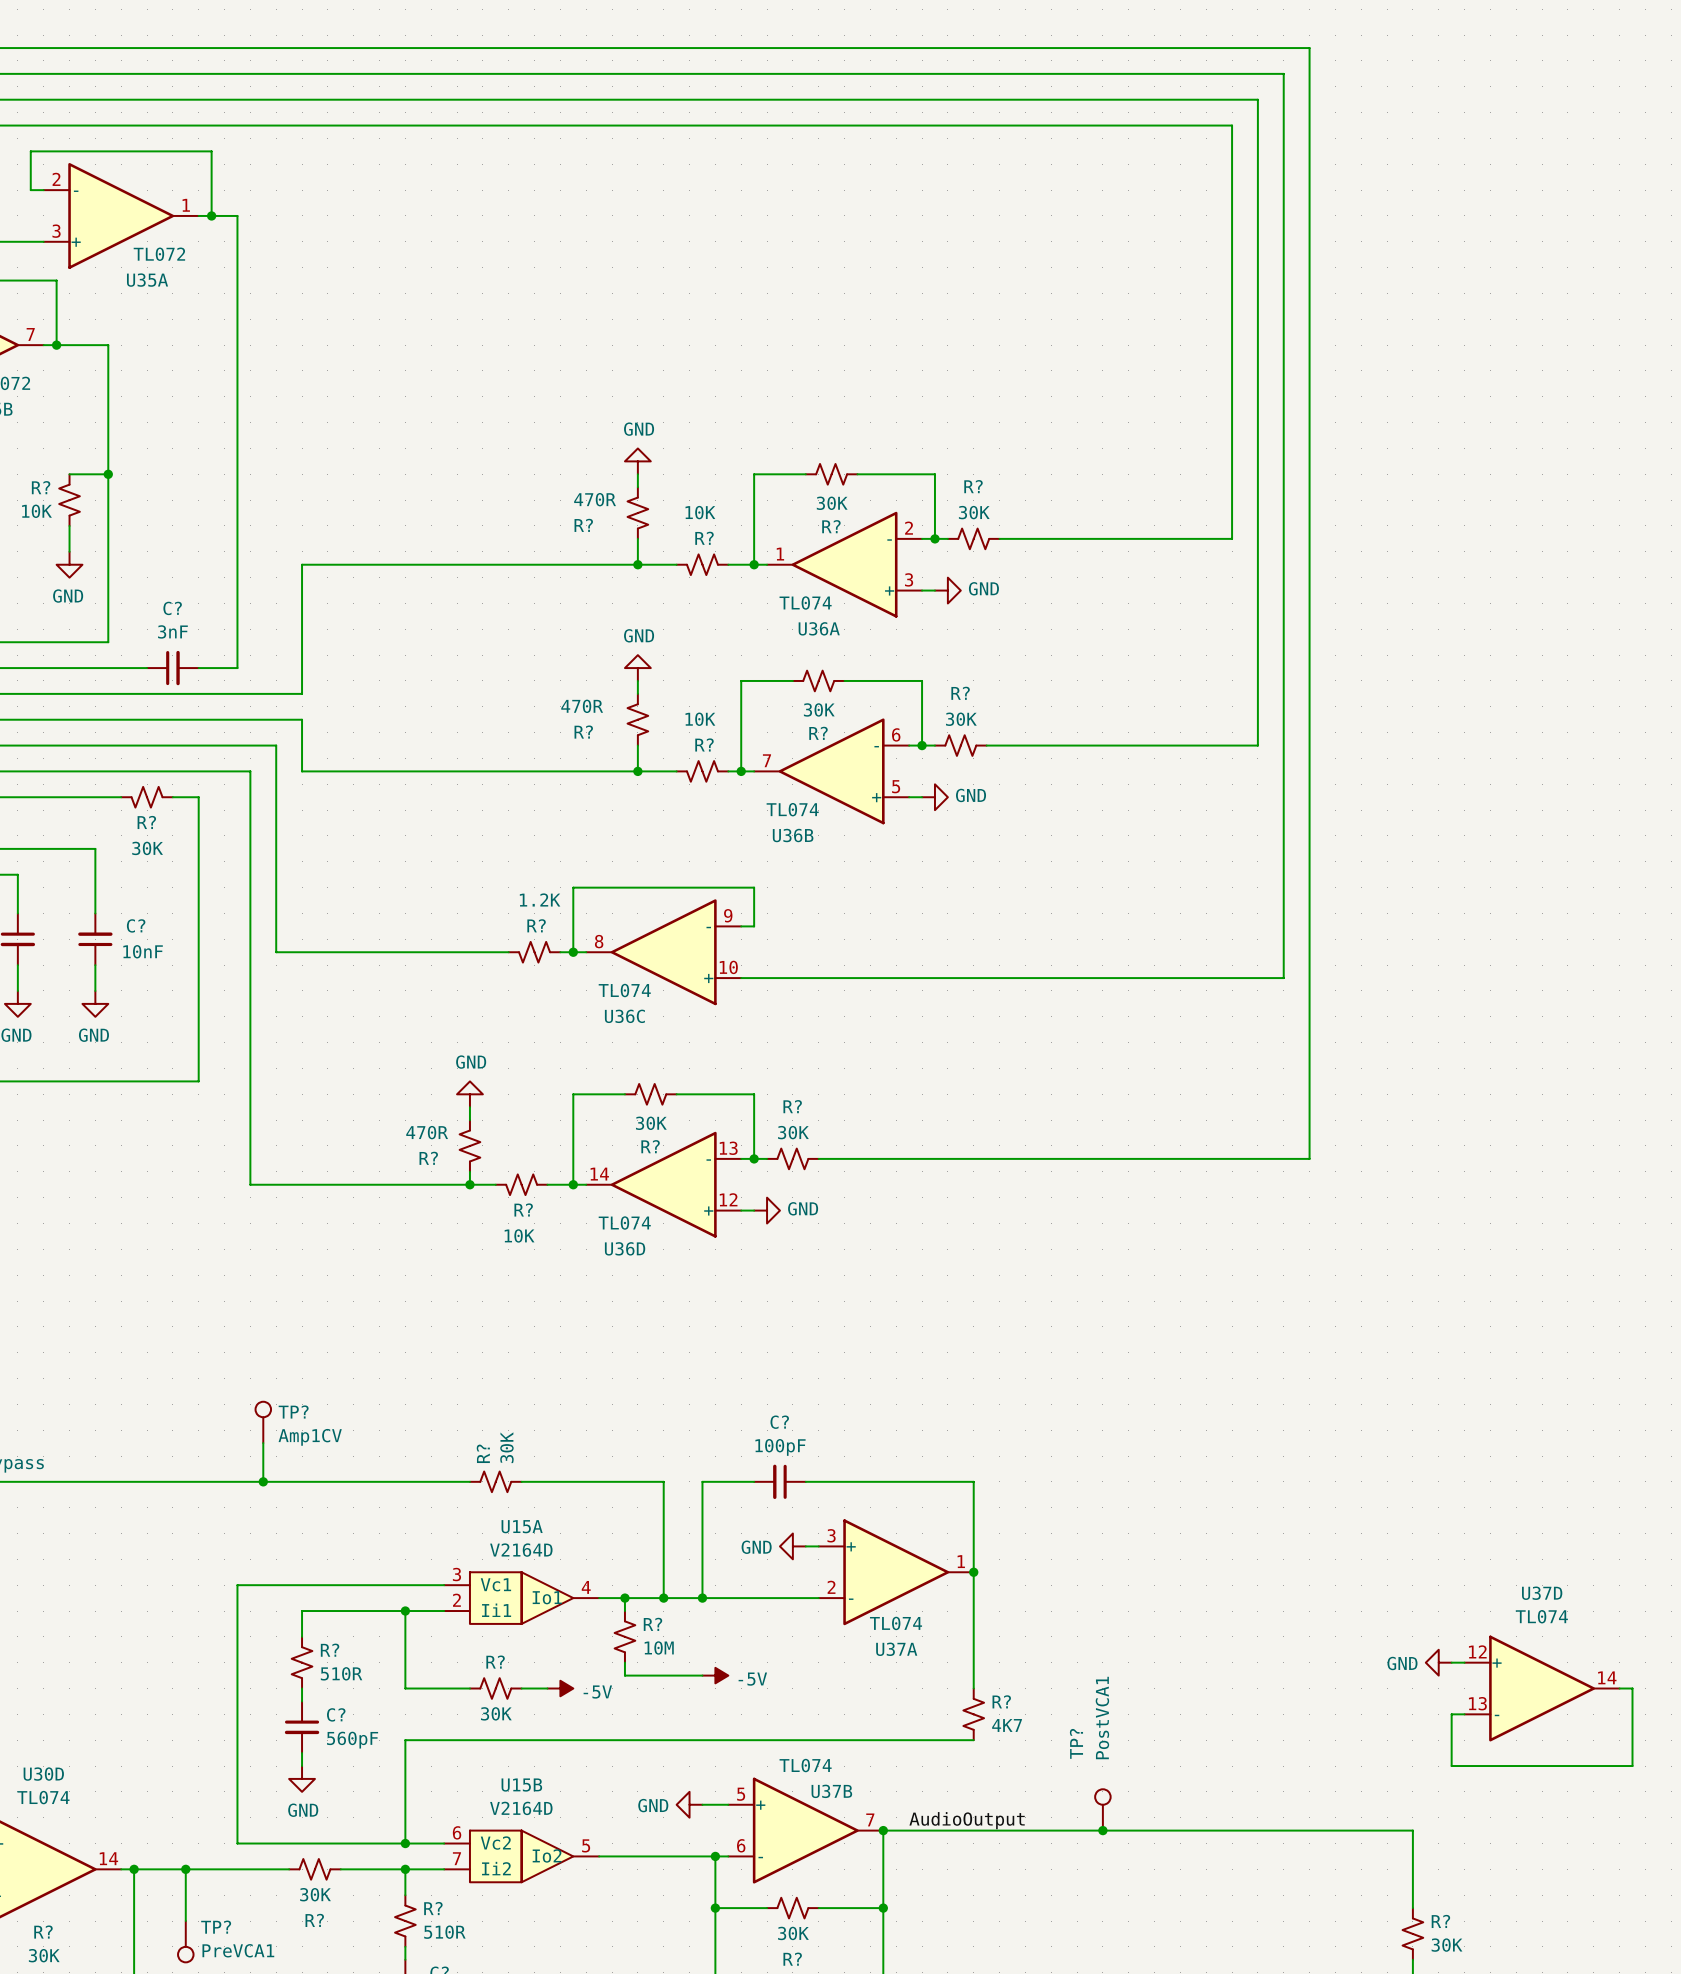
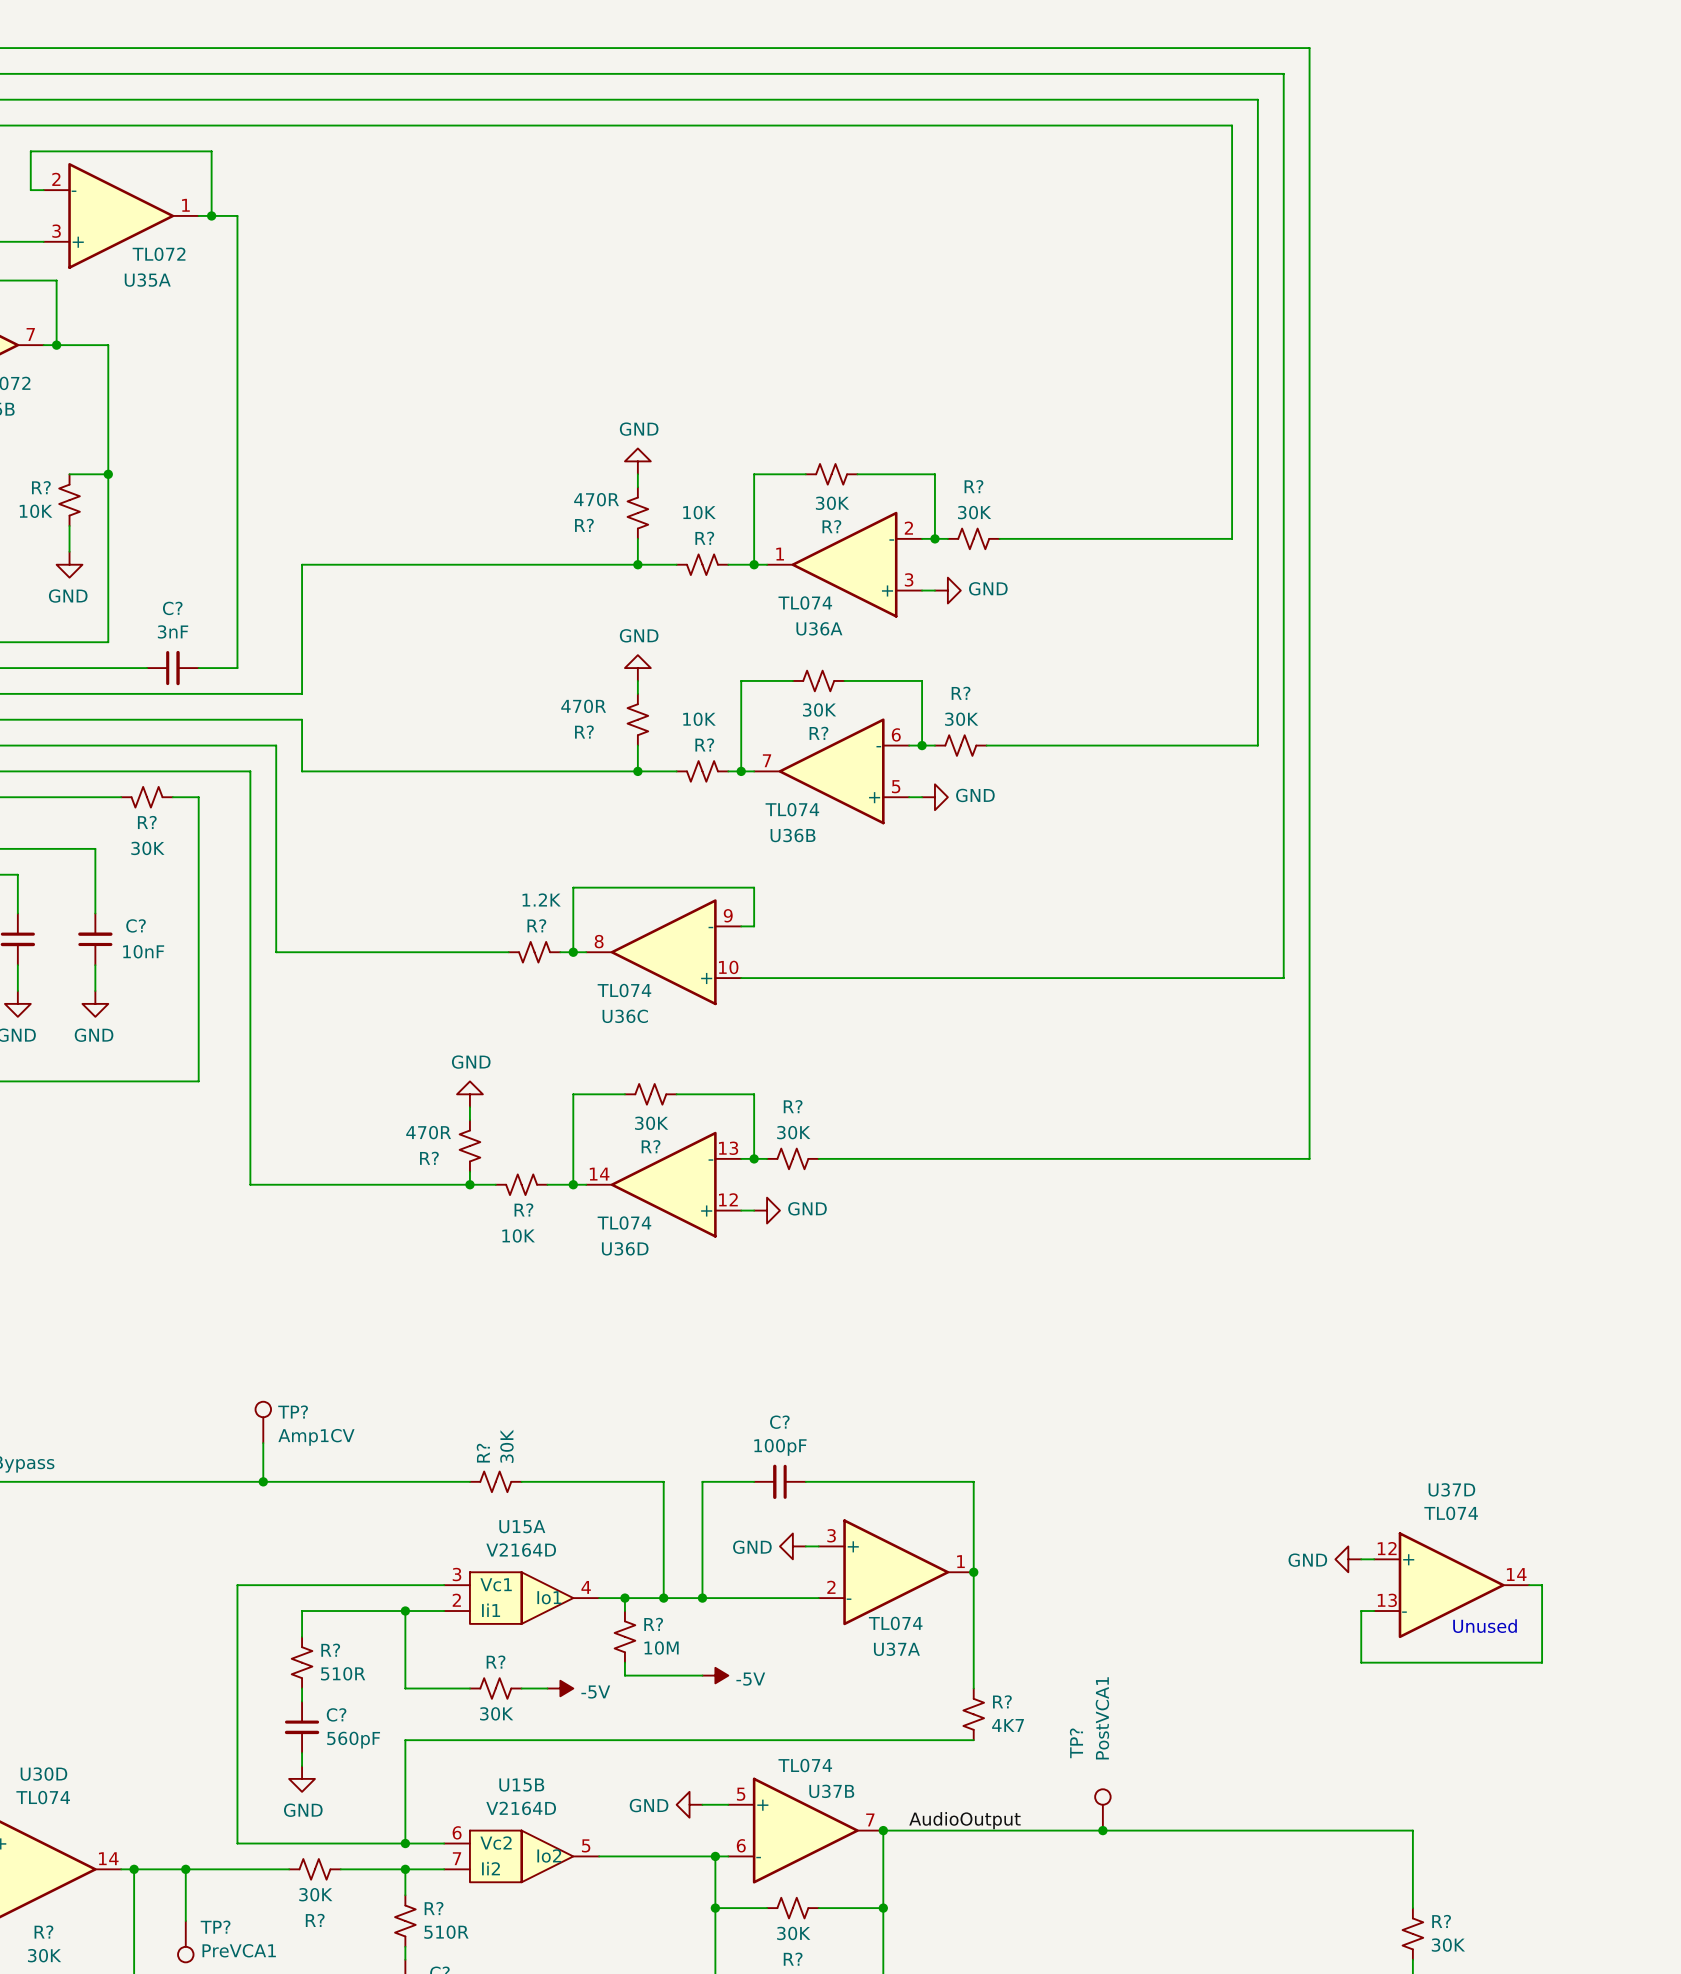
wire: none -> (1361, 1559) (1374, 1559)
wire: none -> (1529, 1585) (1542, 1585) (1542, 1662) (1464, 1662)
wire: none -> (1374, 1611) (1361, 1611) (1361, 1662) (1451, 1662)
text: none -> Unused (1485, 1626)
power symbol position: GND (1438, 1662) -> GND (1348, 1559)
U37D position: (1542, 1688) -> (1451, 1585)
wire: (1619, 1688) (1632, 1688) (1632, 1766) (1451, 1766) (1451, 1714) (1464, 1714) -> none

